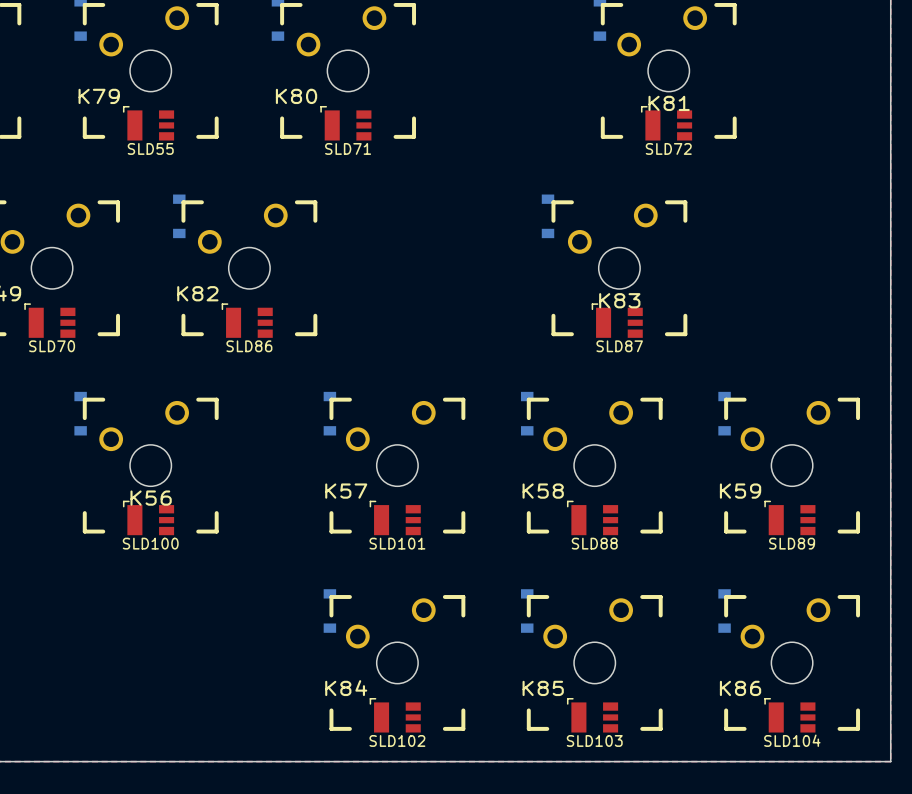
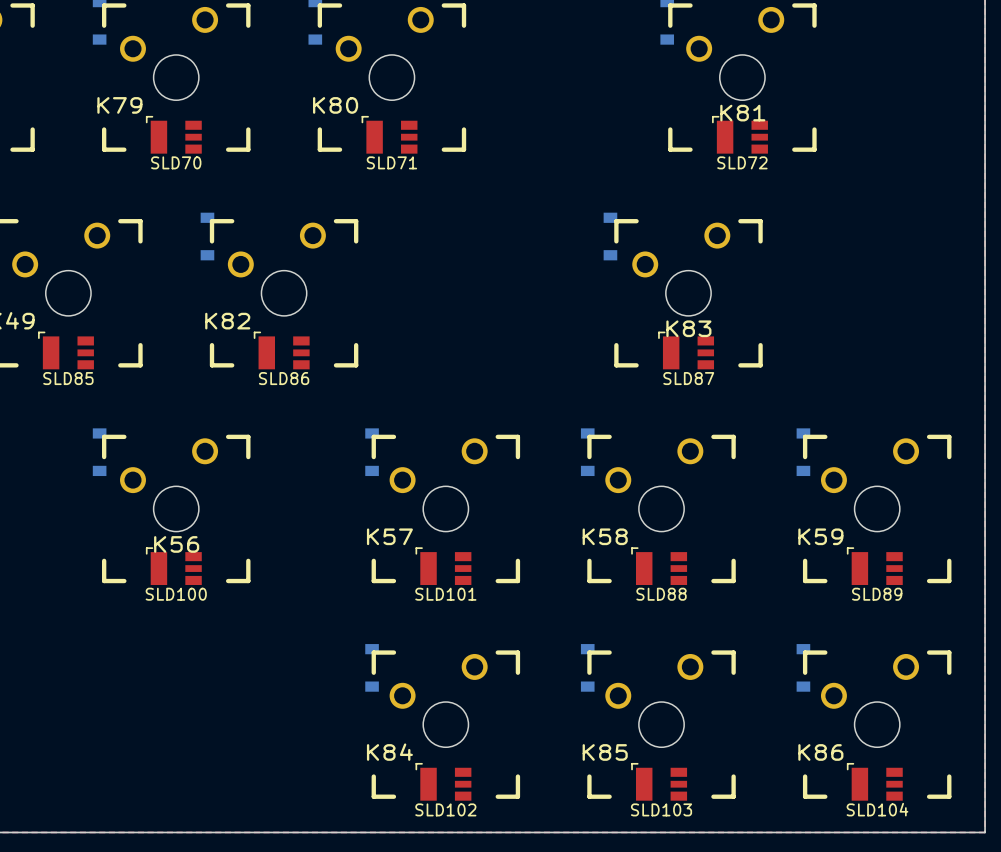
SLD55 name: SLD55 (150, 148) -> SLD70 (176, 162)
SLD70 name: SLD70 (52, 346) -> SLD85 (68, 378)

